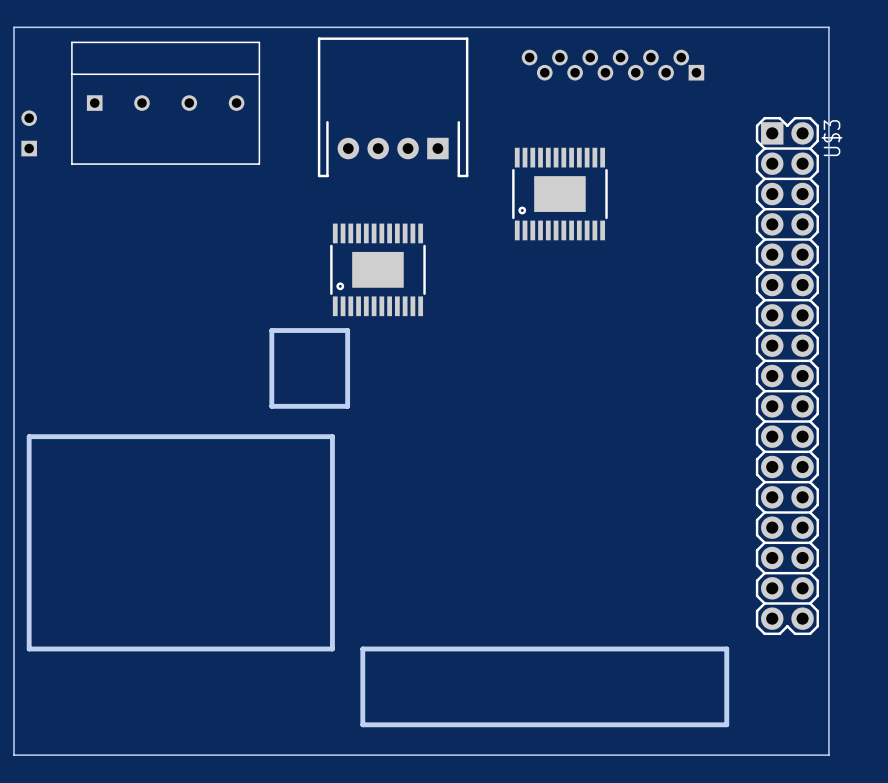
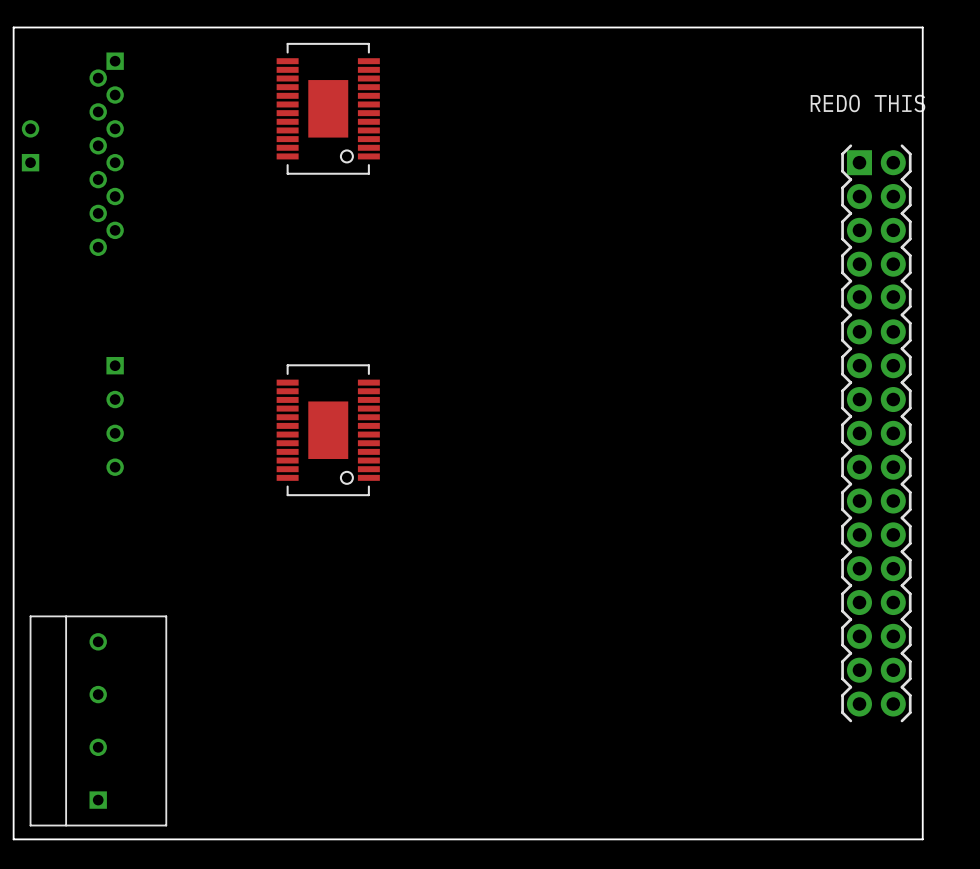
part: (613, 65) -> none
part: none -> (328, 108)
part: (165, 103) -> none
part: (393, 107) -> none
part: none -> (106, 154)
part: (559, 194) -> none
part: (377, 269) -> none
board edge: (271, 330) (271, 406) (347, 406) (347, 330) (271, 330) -> none
part: none -> (115, 416)
U$3: (787, 376) -> none
part: none -> (328, 430)
part: none -> (876, 433)
board edge: (29, 436) (332, 436) (332, 648) (29, 648) (29, 436) -> none
part: none -> (98, 720)
board edge: (362, 648) (726, 648) (726, 724) (362, 724) (362, 648) -> none

